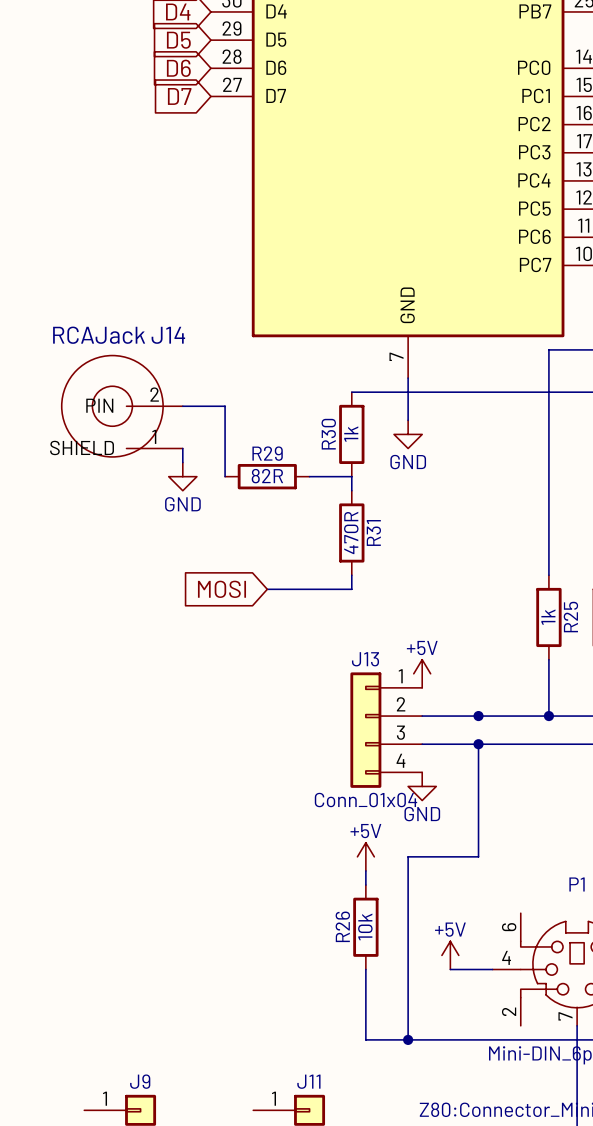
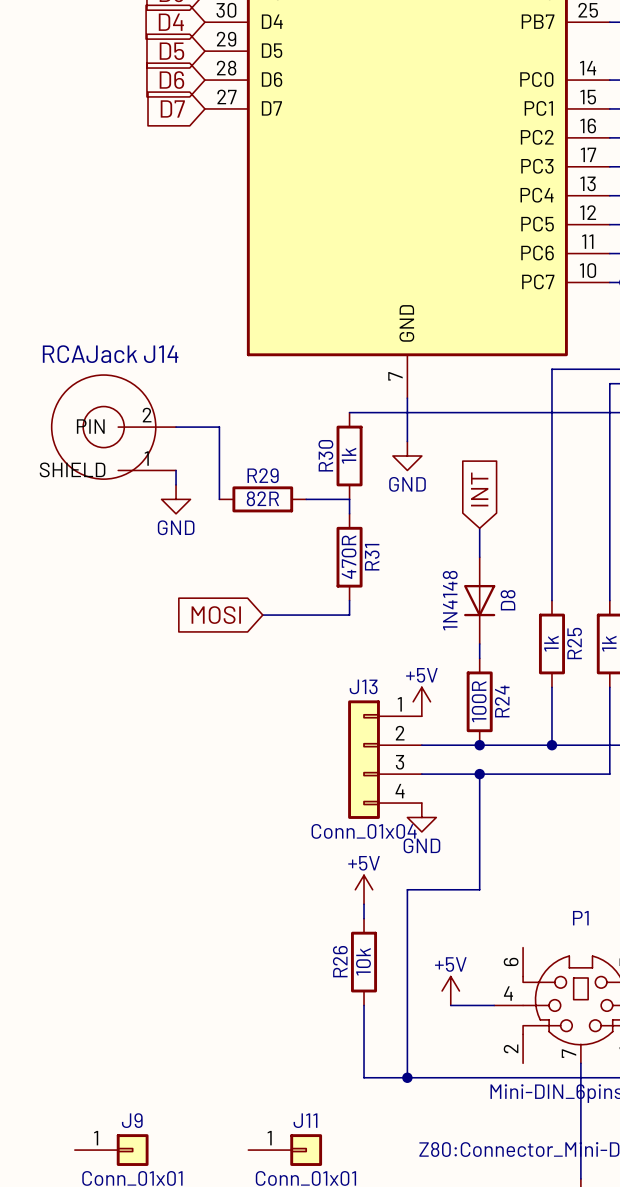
global label: none -> INT (479, 489)
wire: none -> (479, 528) (479, 557)
D8: none -> 1N4148 (479, 600)
wire: none -> (479, 643) (479, 658)
R24: none -> 100R (479, 701)

